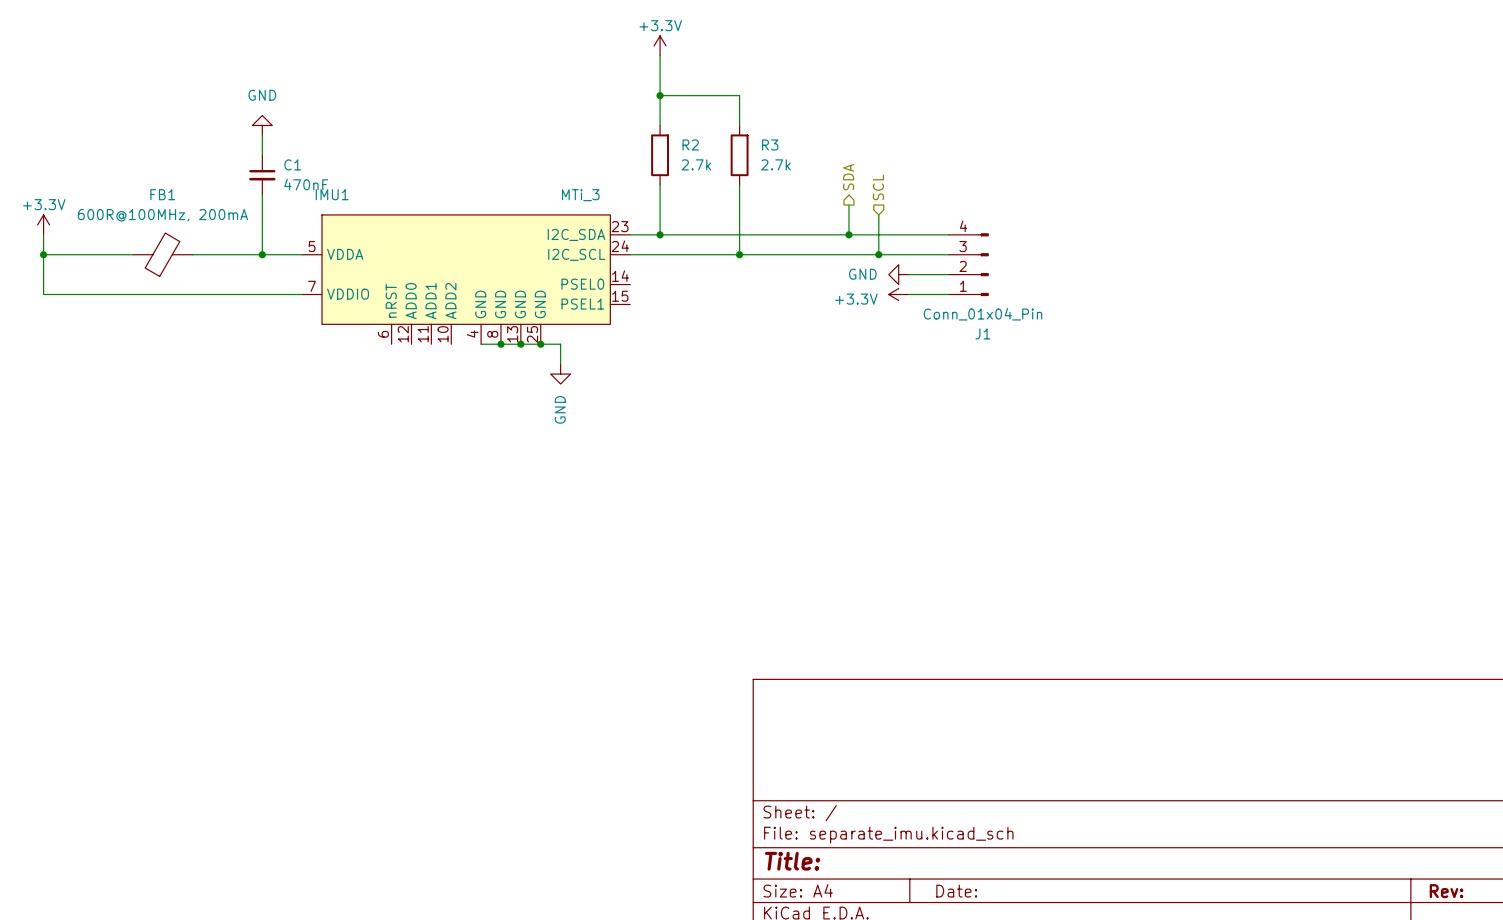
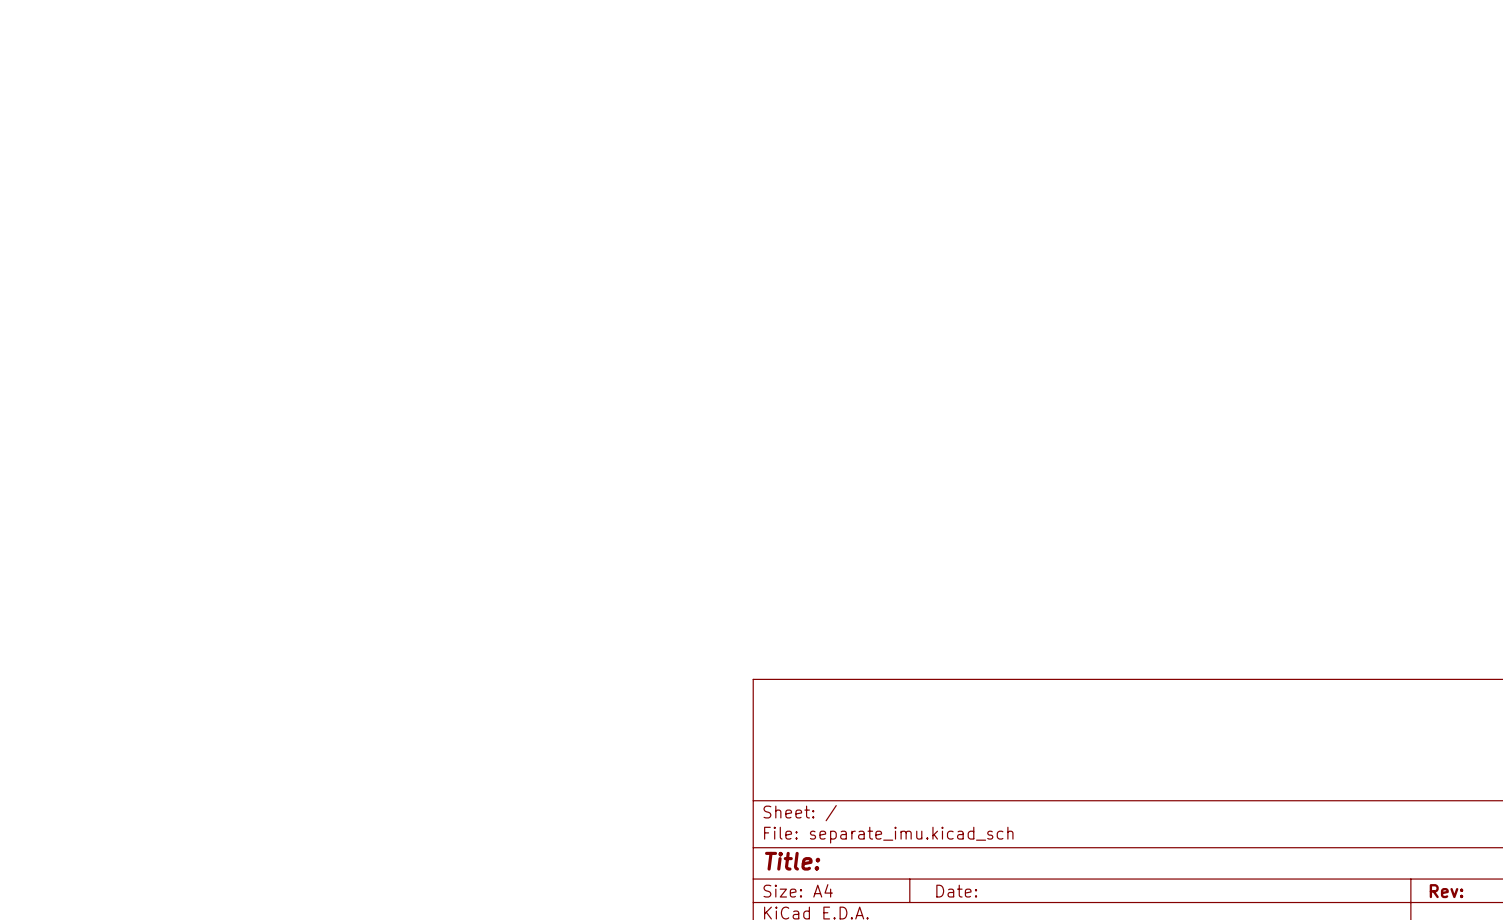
power symbol: +3.3V (660, 45) -> none
wire: (660, 55) (660, 125) -> none
wire: (660, 95) (739, 95) (739, 125) -> none
junction: (660, 95) -> none
power symbol: GND (262, 125) -> none
wire: (262, 135) (262, 155) -> none
R2: 2.7k (660, 155) -> none
R3: 2.7k (739, 155) -> none
C1: 470nF (262, 175) -> none
hierarchical label: SDA (848, 177) -> none
wire: (660, 185) (660, 234) -> none
wire: (739, 185) (739, 254) -> none
hierarchical label: SCL (878, 187) -> none
wire: (262, 195) (262, 254) -> none
wire: (848, 205) (848, 234) -> none
wire: (878, 214) (878, 254) -> none
power symbol: +3.3V (43, 224) -> none
wire: (43, 234) (43, 294) (302, 294) -> none
wire: (630, 234) (948, 234) -> none
junction: (660, 234) -> none
junction: (848, 234) -> none
wire: (43, 254) (133, 254) -> none
junction: (43, 254) -> none
FB1: 600R@100MHz, 200mA (162, 254) -> none
wire: (192, 254) (302, 254) -> none
junction: (262, 254) -> none
wire: (630, 254) (948, 254) -> none
junction: (739, 254) -> none
junction: (878, 254) -> none
J1: Conn_01x04_Pin (968, 264) -> none
power symbol: GND (898, 274) -> none
wire: (908, 274) (948, 274) -> none
IMU1: MTi_3 (466, 279) -> none
power symbol: +3.3V (898, 294) -> none
wire: (908, 294) (948, 294) -> none
wire: (481, 344) (560, 344) (560, 364) -> none
junction: (500, 344) -> none
junction: (520, 344) -> none
junction: (540, 344) -> none
power symbol: GND (560, 374) -> none

